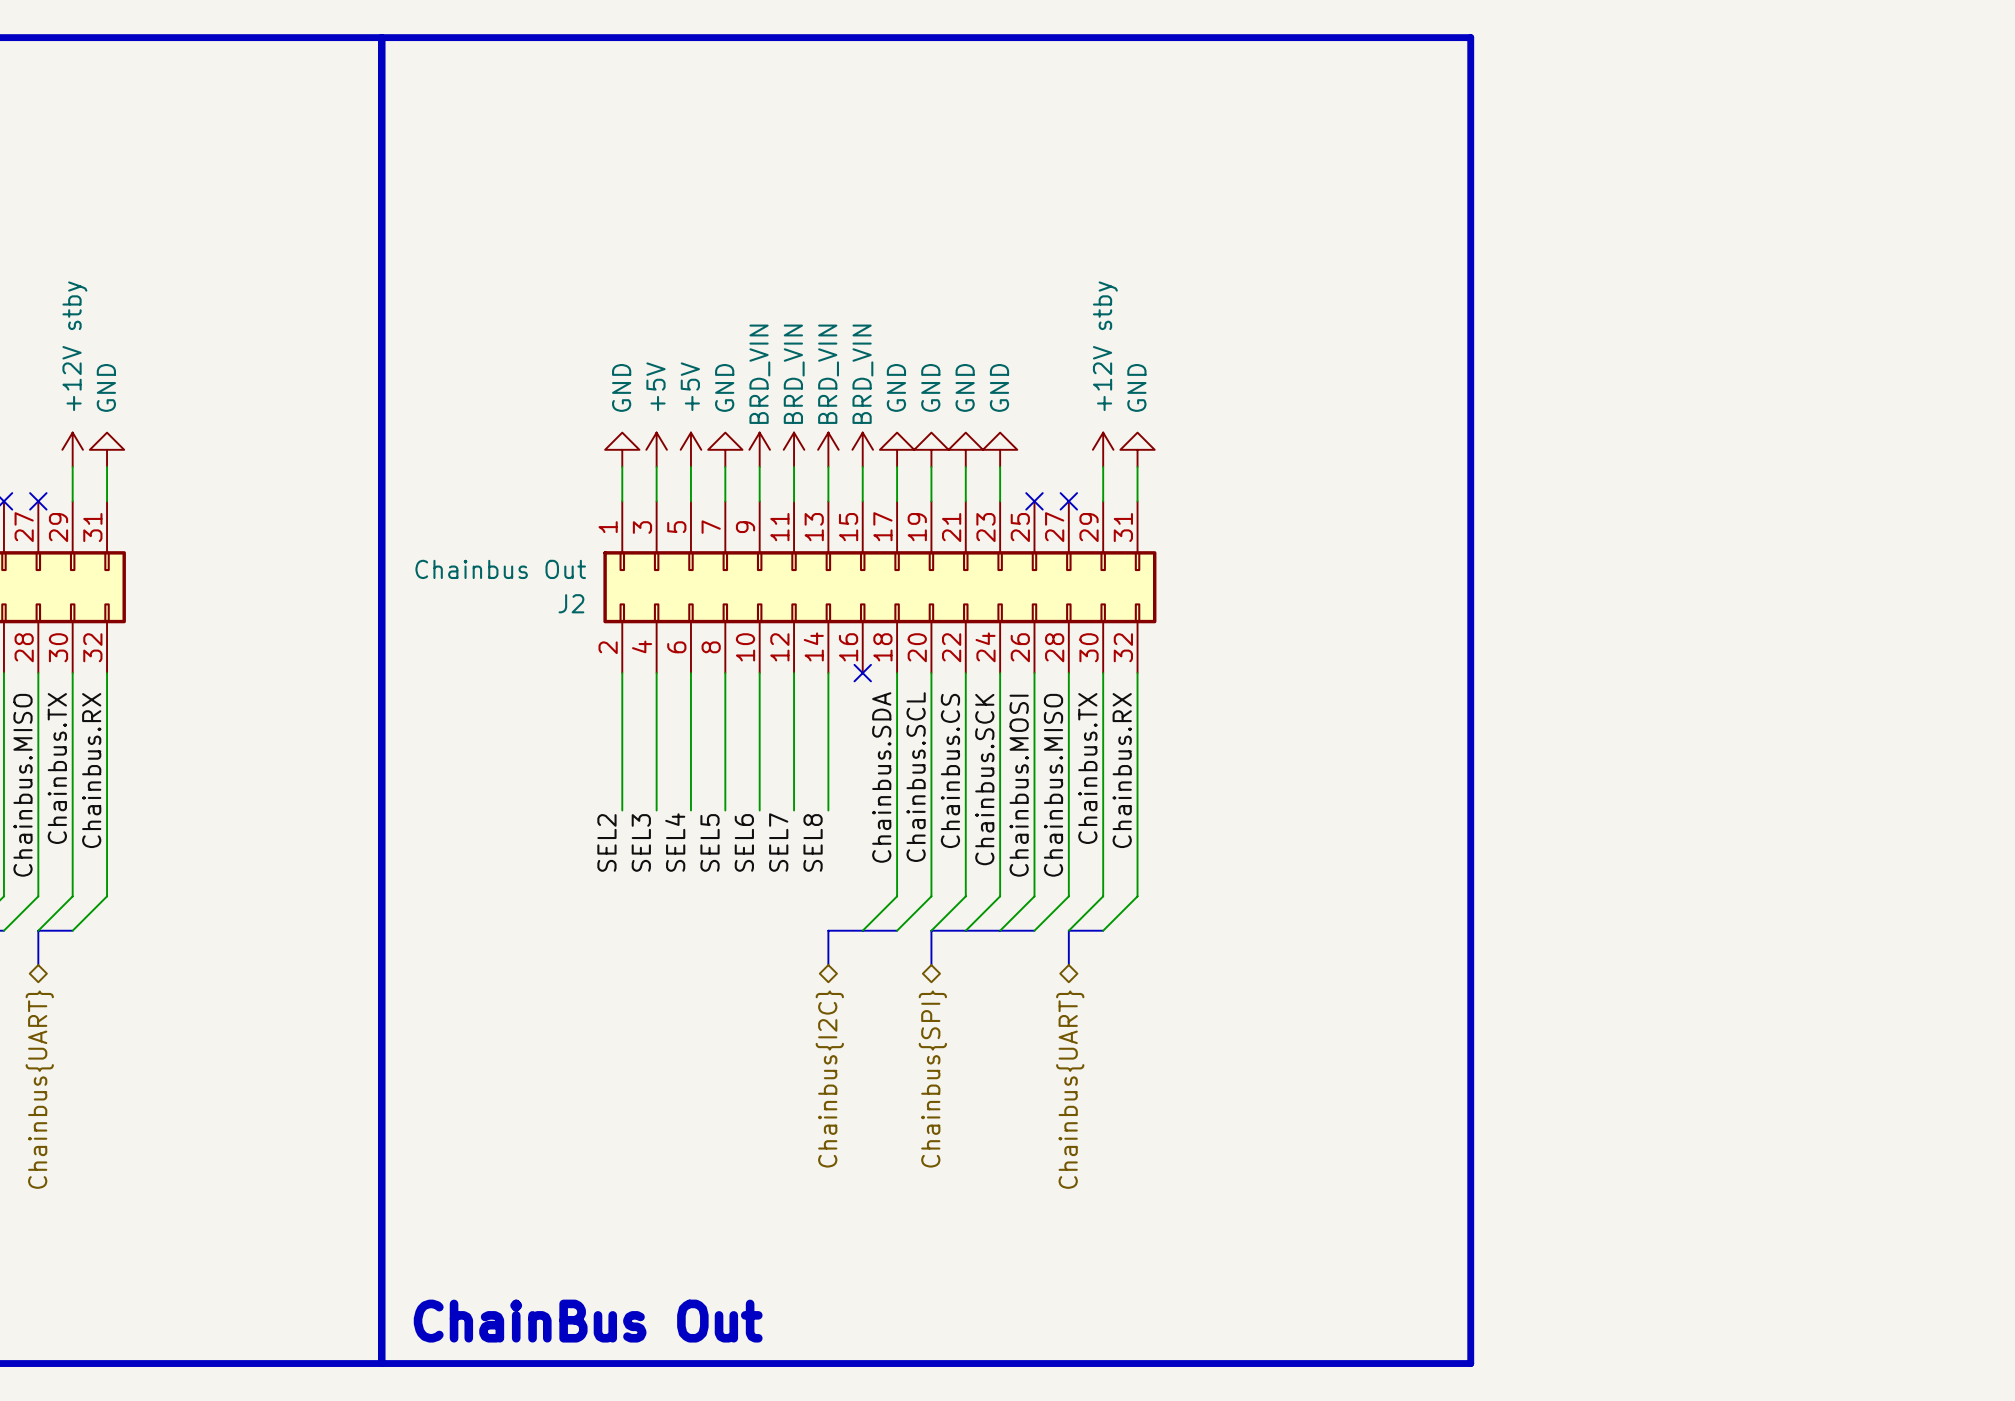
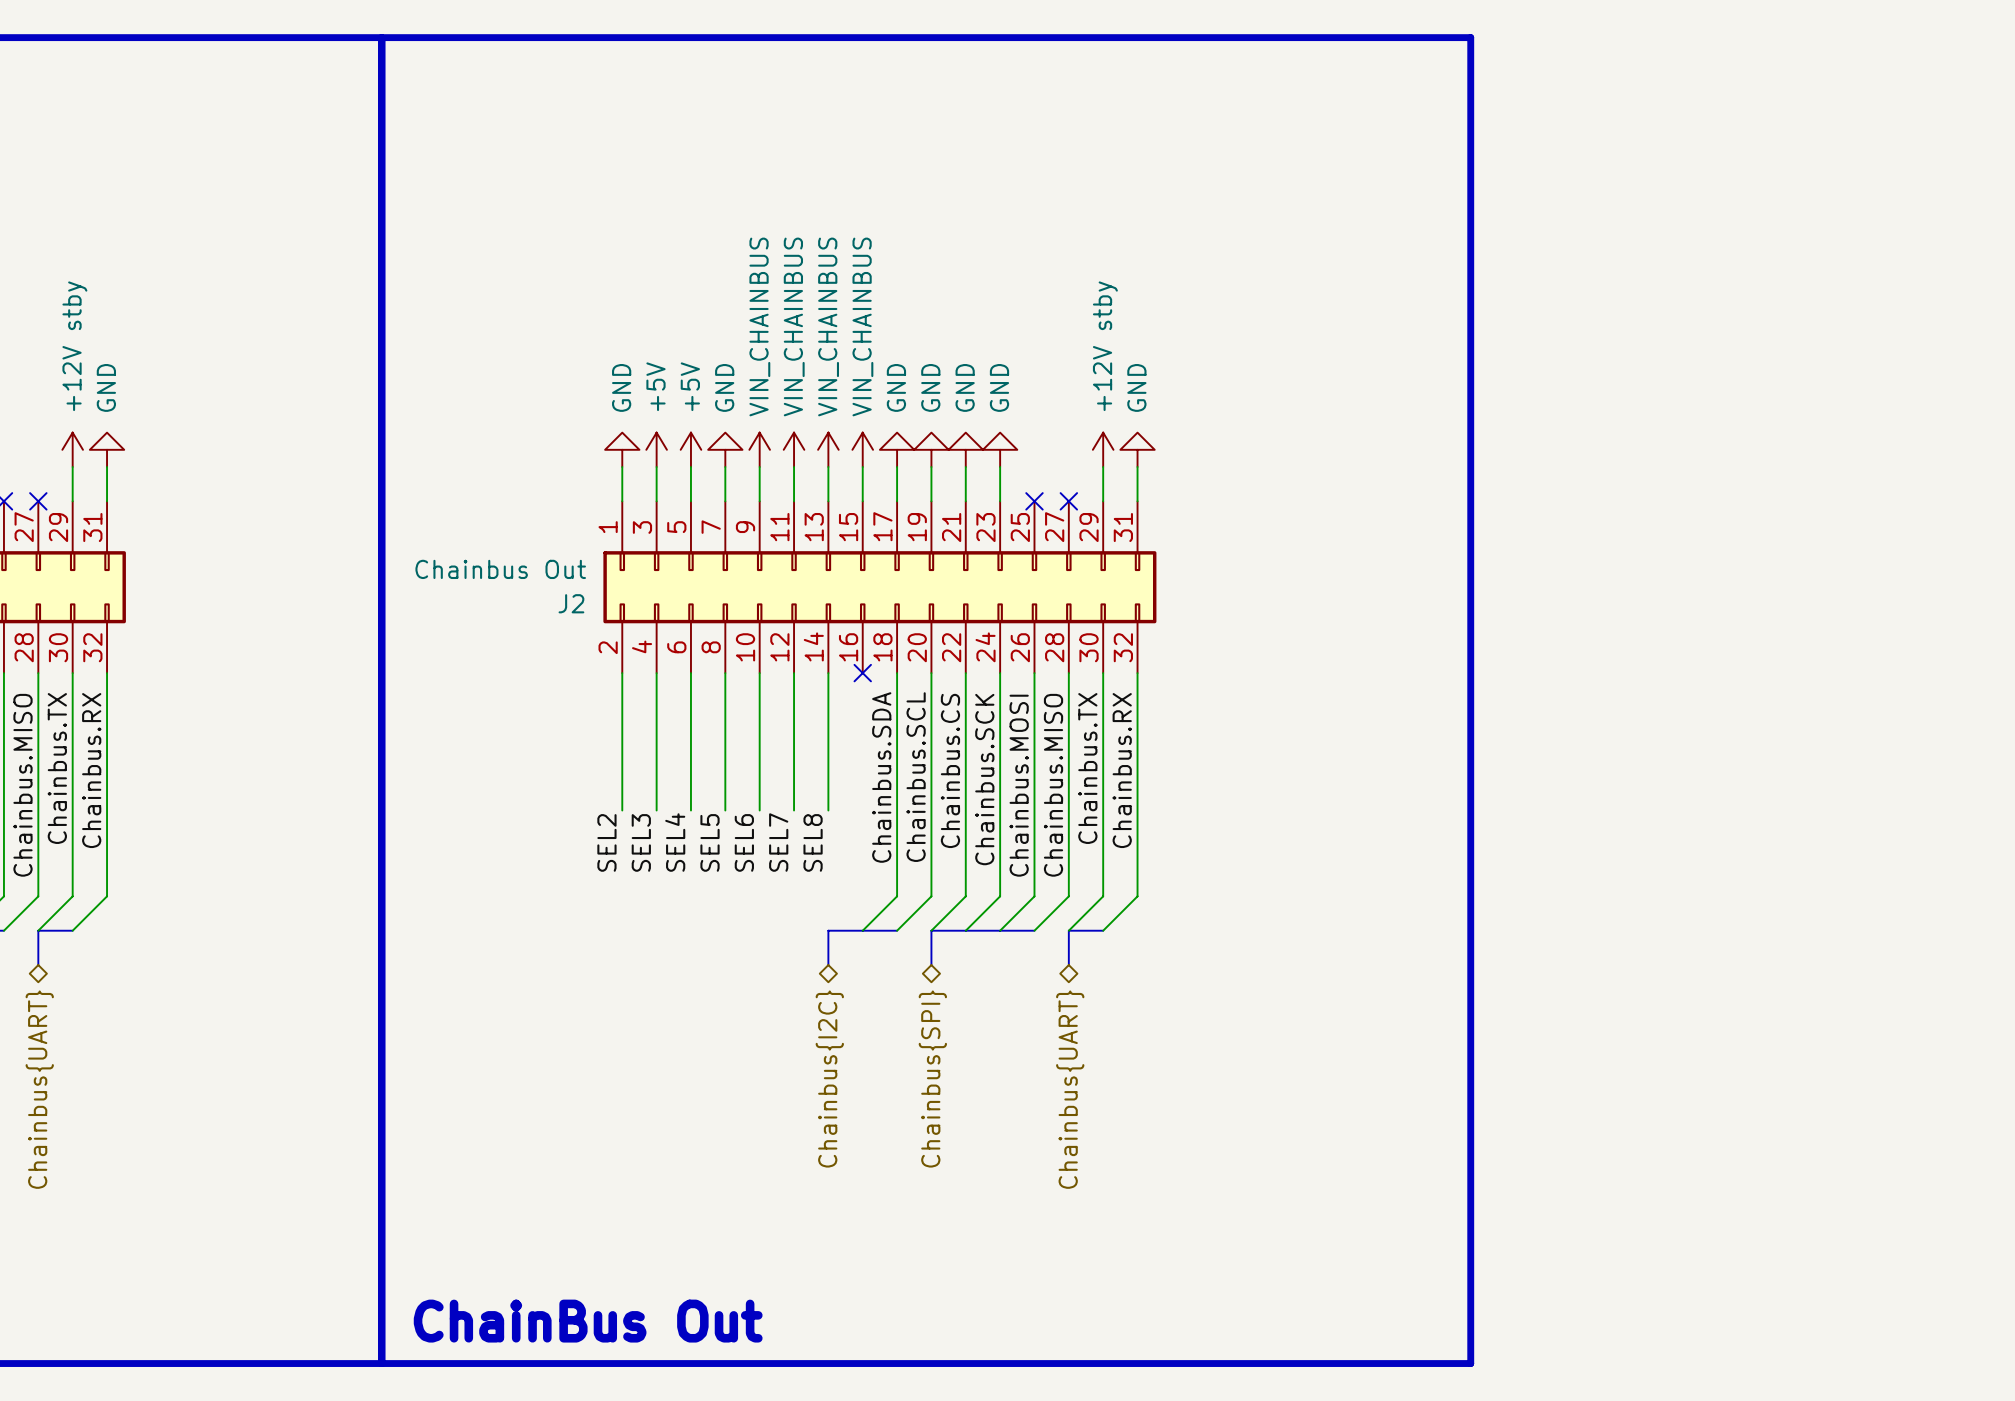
power symbol: BRD_VIN (759, 449) -> VIN_CHAINBUS (759, 449)
power symbol: BRD_VIN (794, 449) -> VIN_CHAINBUS (794, 449)
power symbol: BRD_VIN (828, 449) -> VIN_CHAINBUS (828, 449)
power symbol: BRD_VIN (862, 449) -> VIN_CHAINBUS (862, 449)

